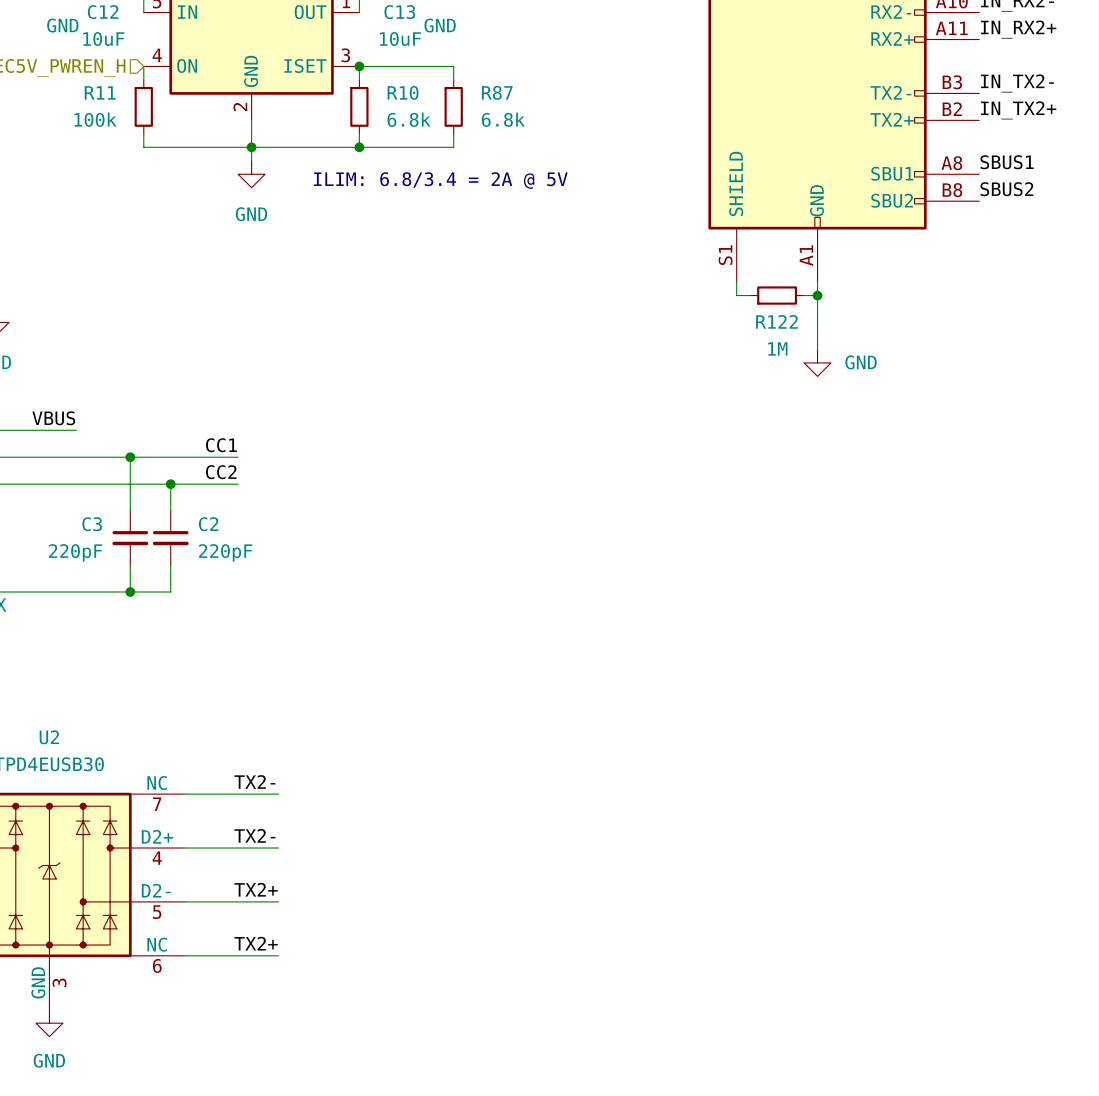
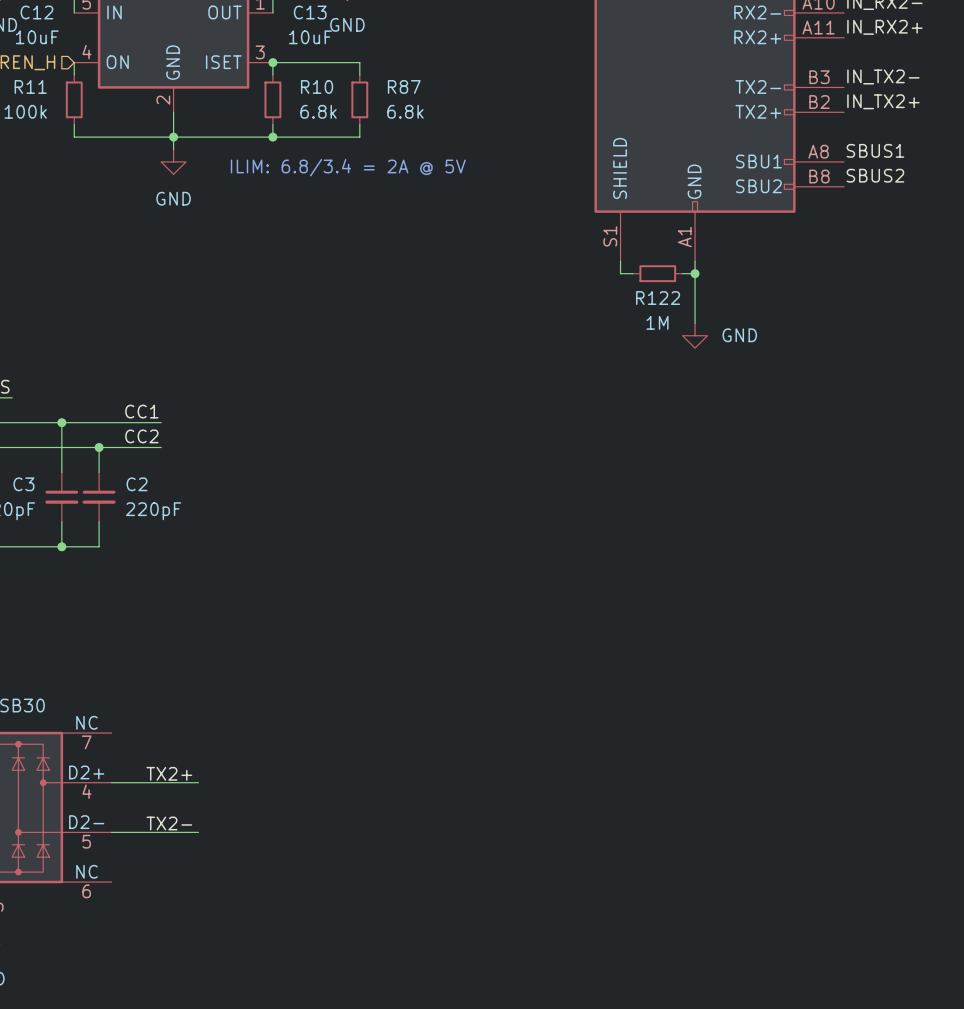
label: TX2- (254, 781) -> none
wire: (184, 794) (278, 794) -> none
label: TX2- (254, 835) -> TX2+ (169, 773)
label: TX2+ (256, 889) -> TX2- (169, 823)
label: TX2+ (256, 943) -> none
wire: (184, 955) (278, 955) -> none

